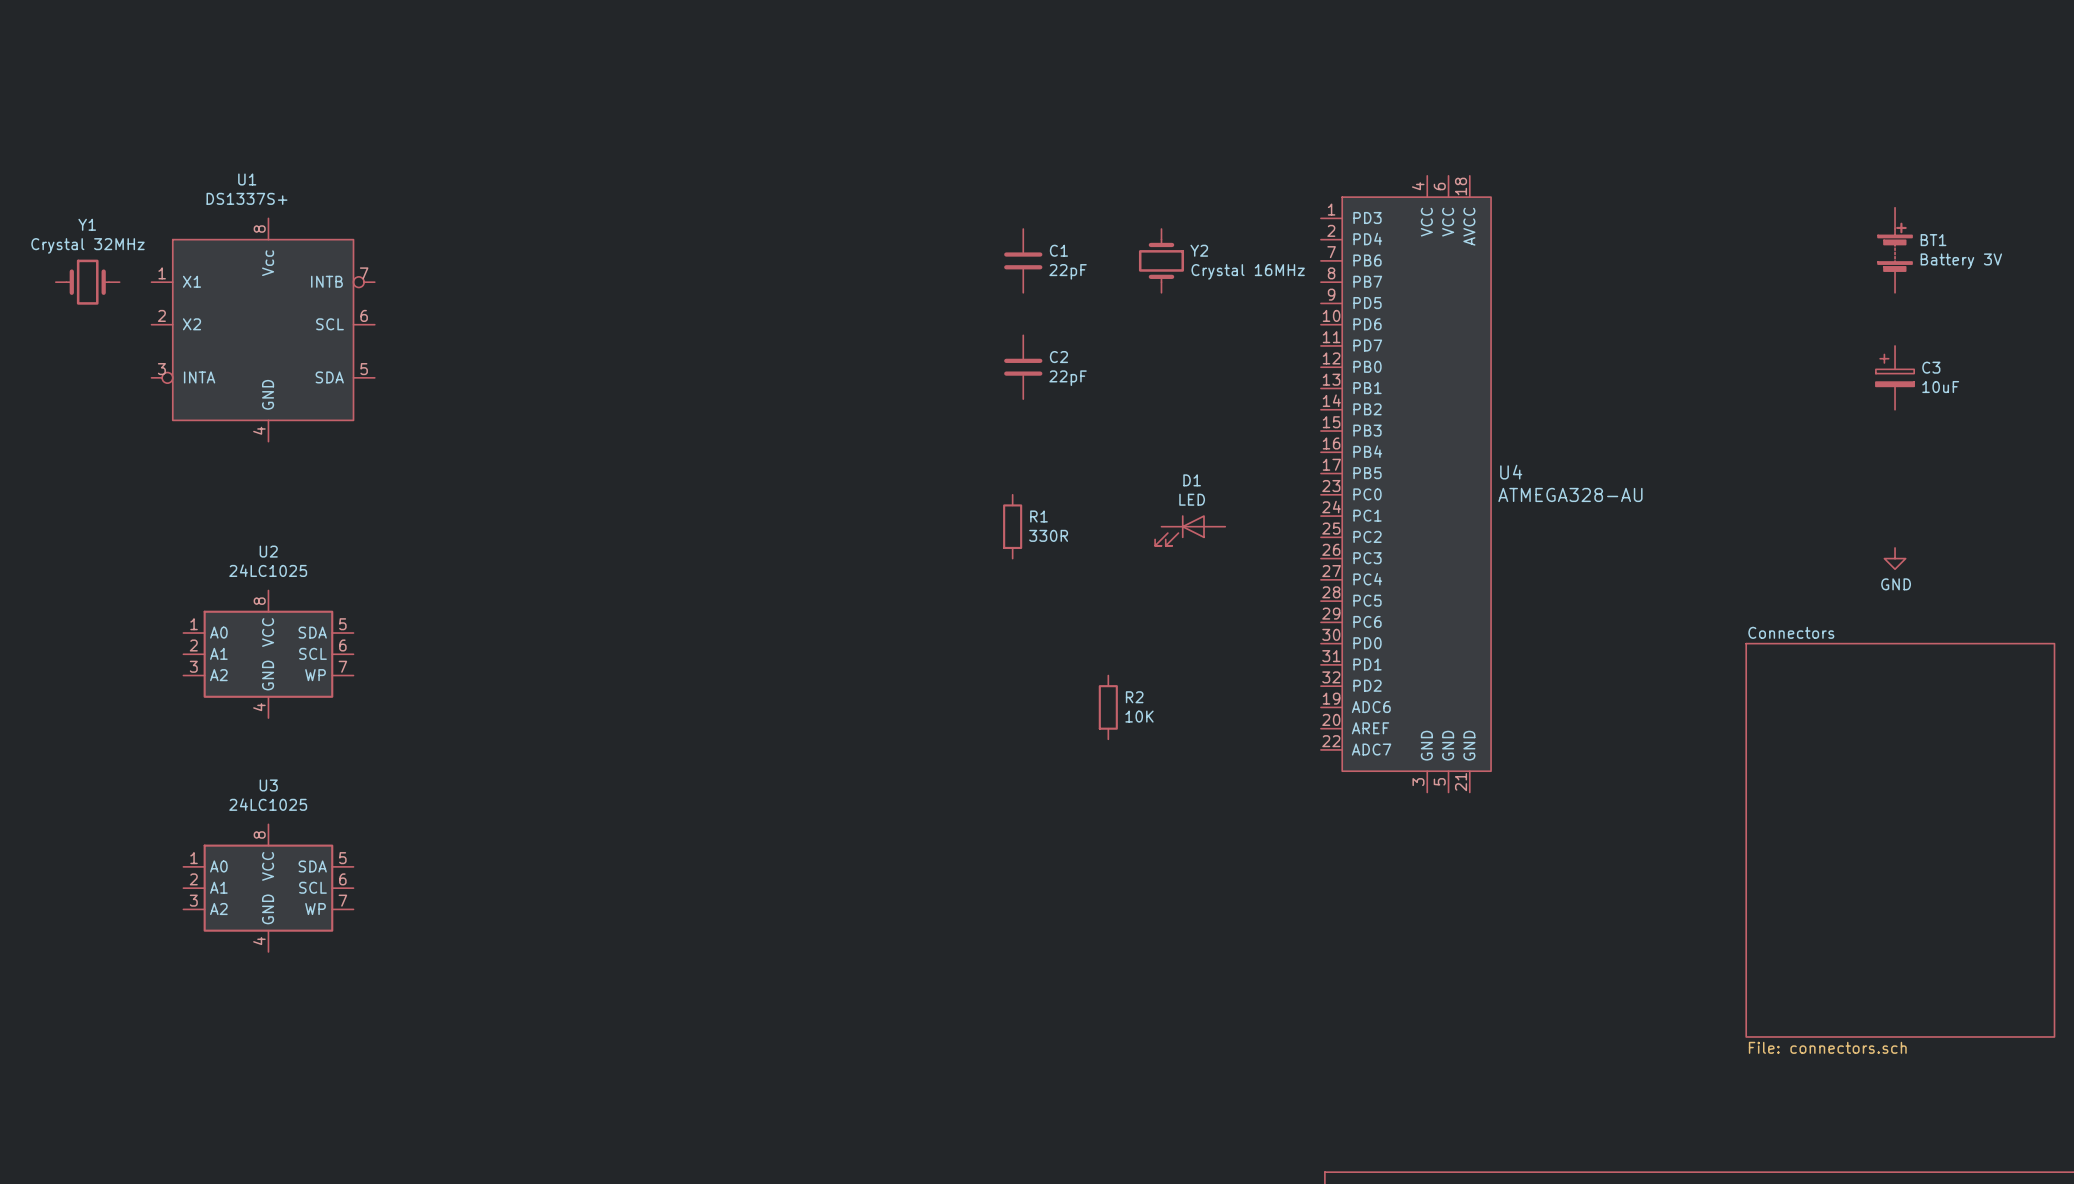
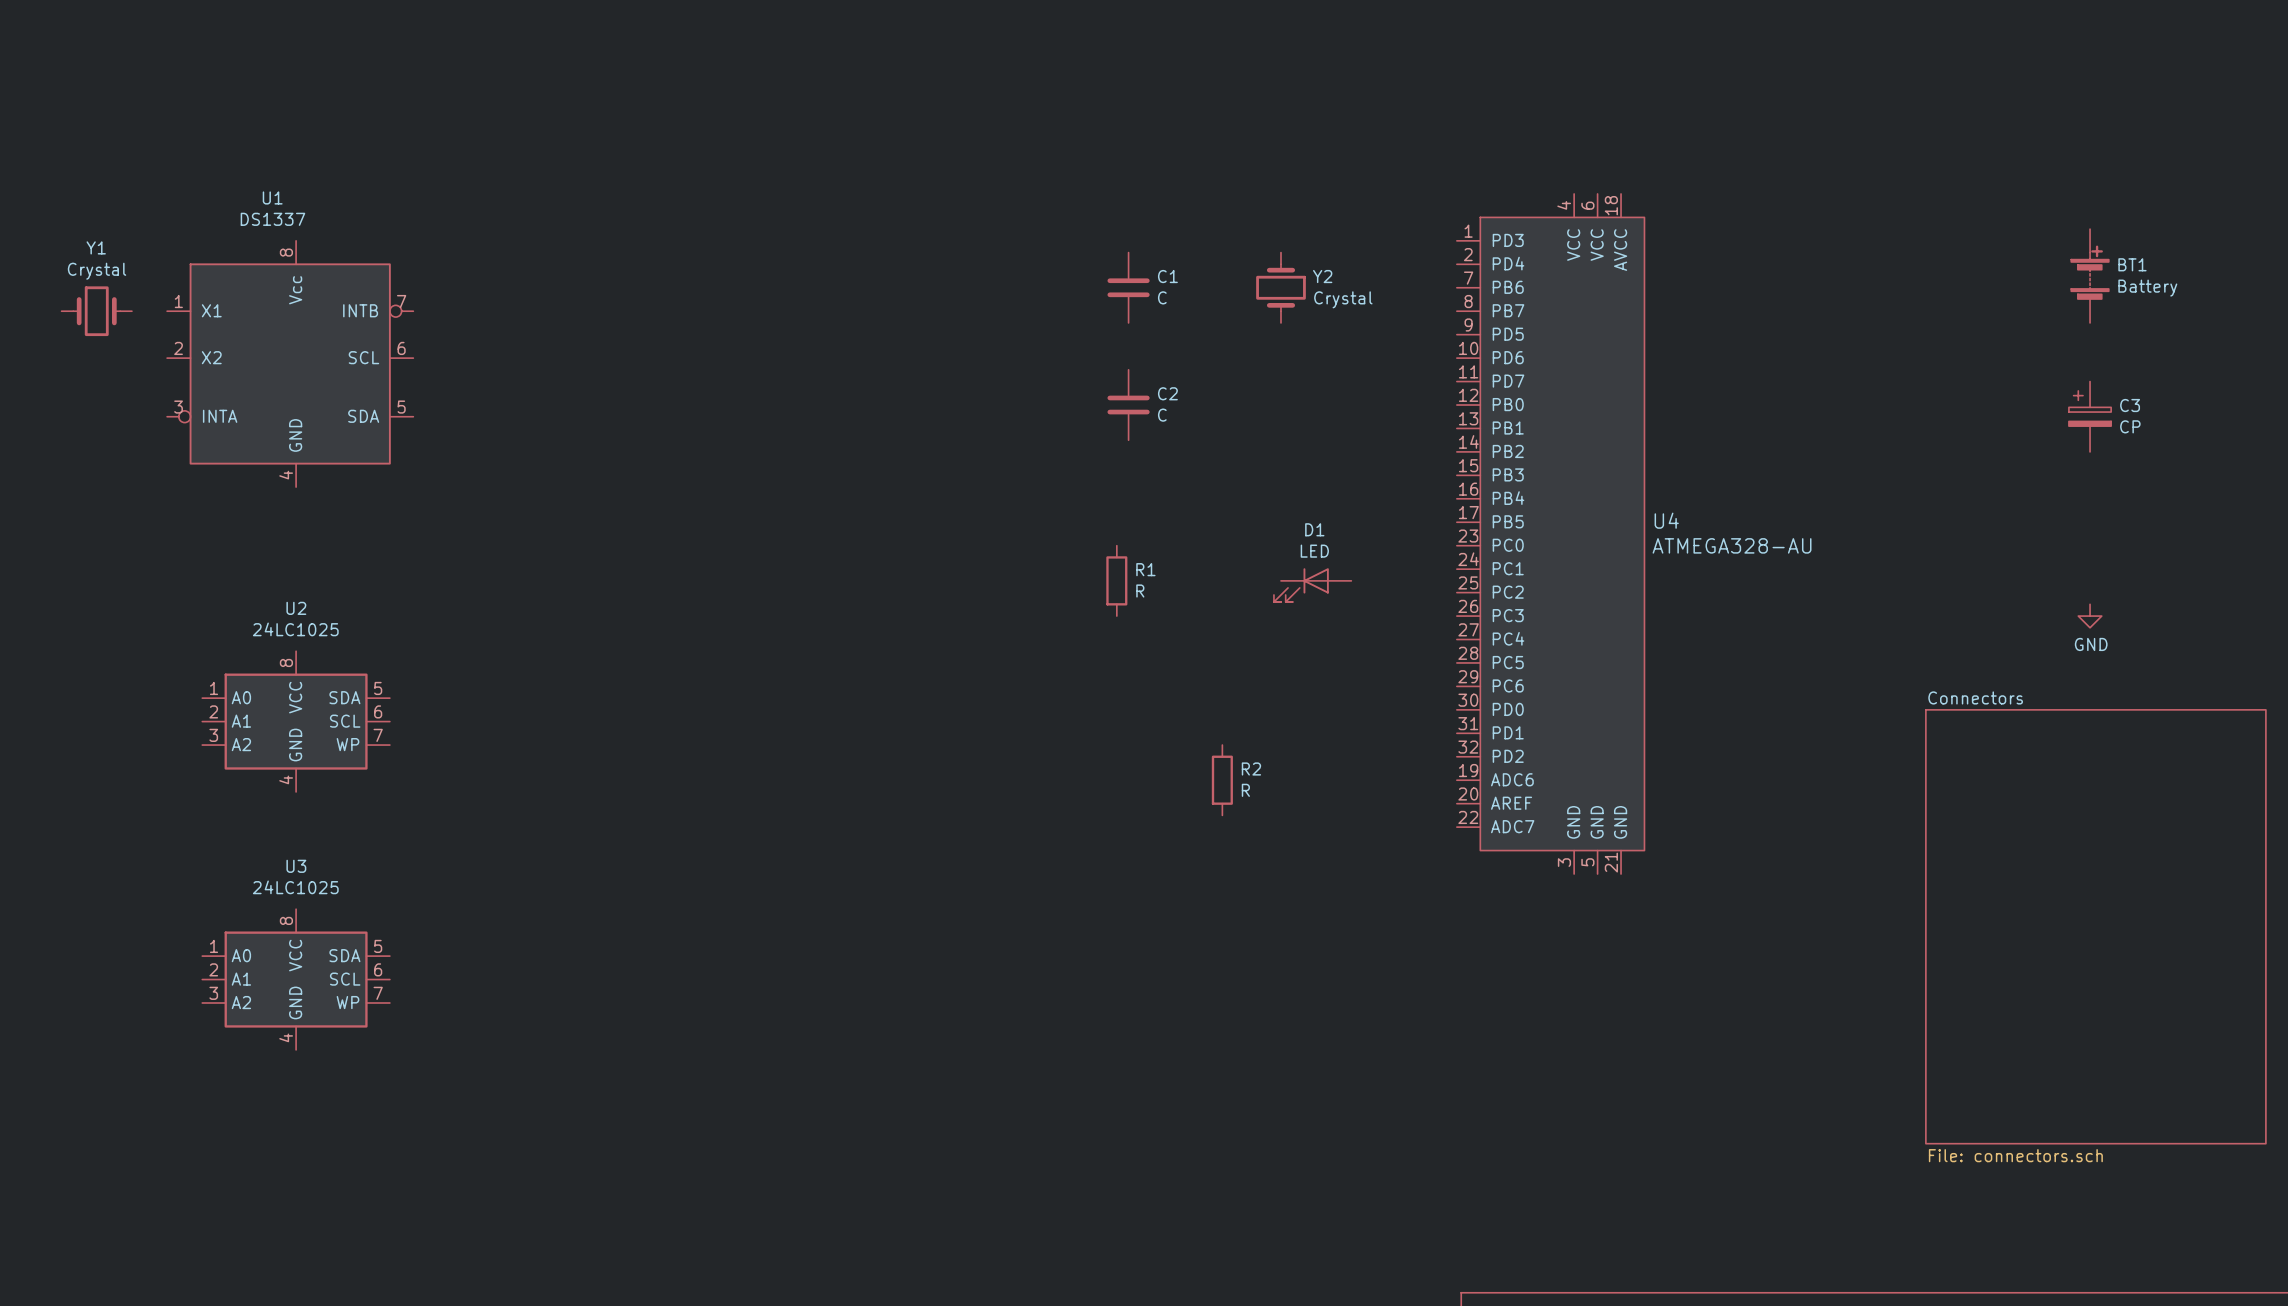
U1 value: DS1337S+ (246, 198) -> DS1337 (272, 219)
Y1 value: Crystal 32MHz (87, 245) -> Crystal (97, 271)
BT1 value: Battery 3V (1961, 261) -> Battery (2147, 288)
C1 value: 22pF (1068, 271) -> C (1162, 297)
Y2 value: Crystal 16MHz (1248, 271) -> Crystal (1343, 299)
C2 value: 22pF (1068, 378) -> C (1162, 415)
C3 value: 10uF (1940, 387) -> CP (2130, 426)
R1 value: 330R (1048, 535) -> R (1140, 591)
R2 value: 10K (1139, 716) -> R (1245, 790)

